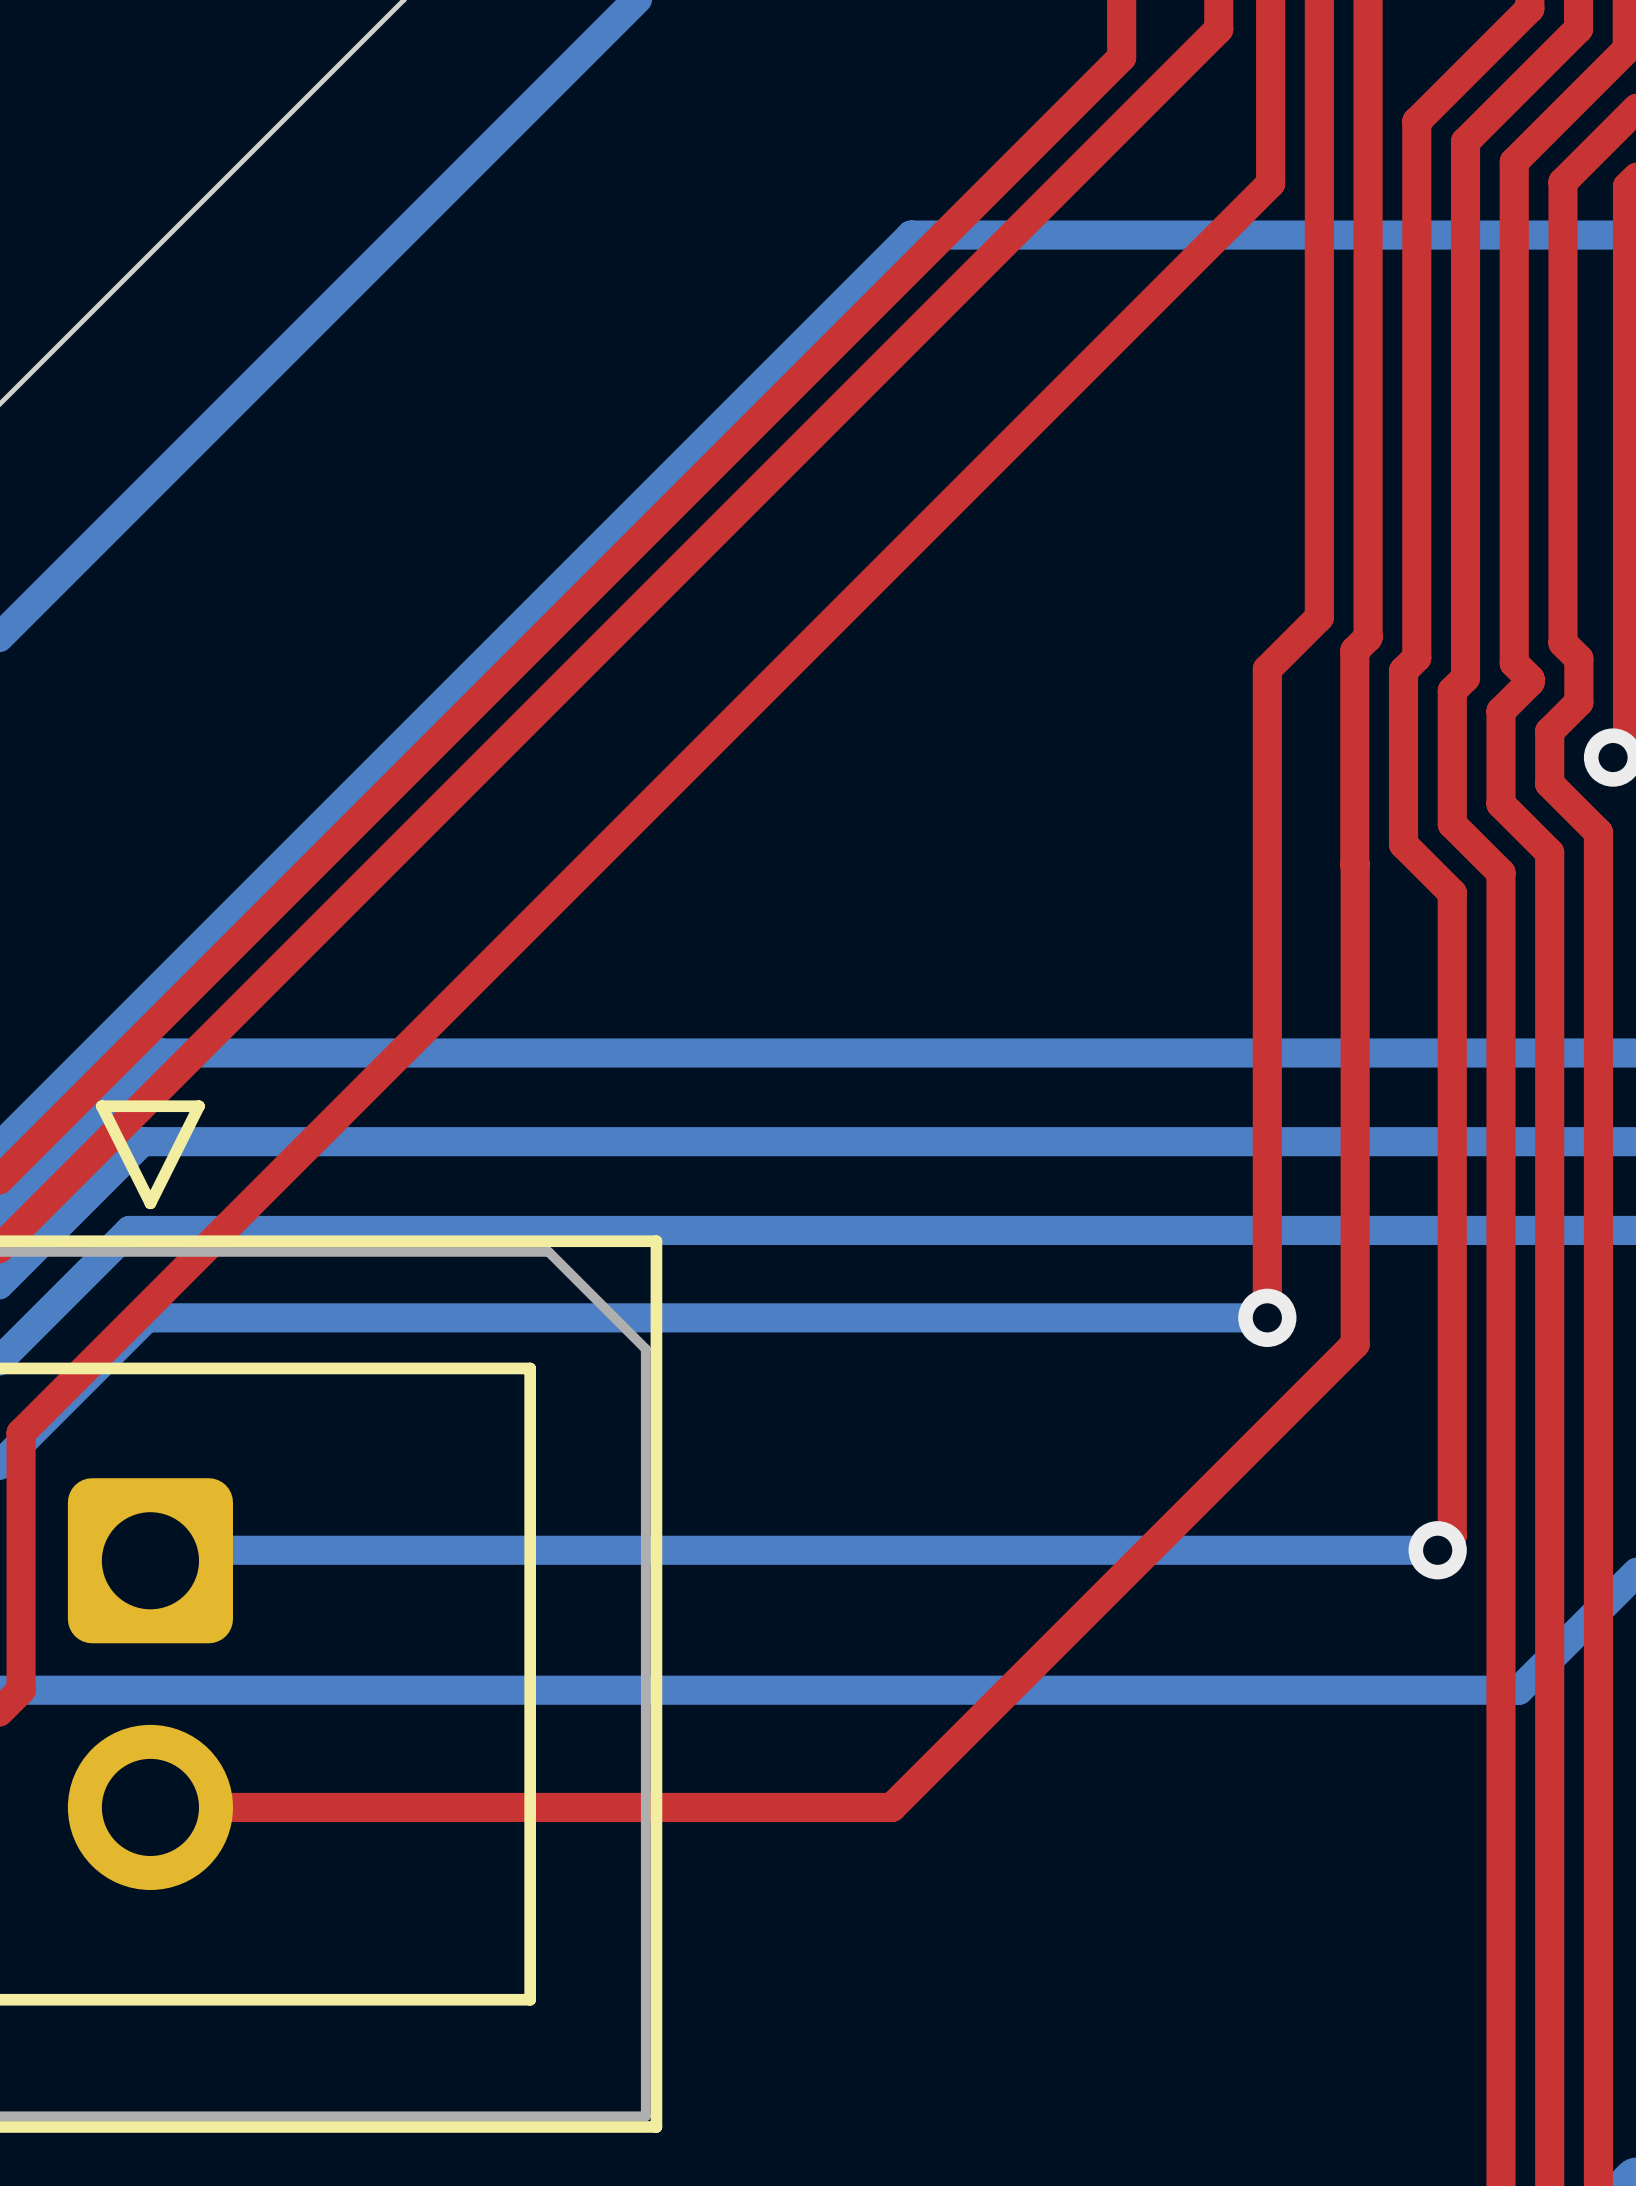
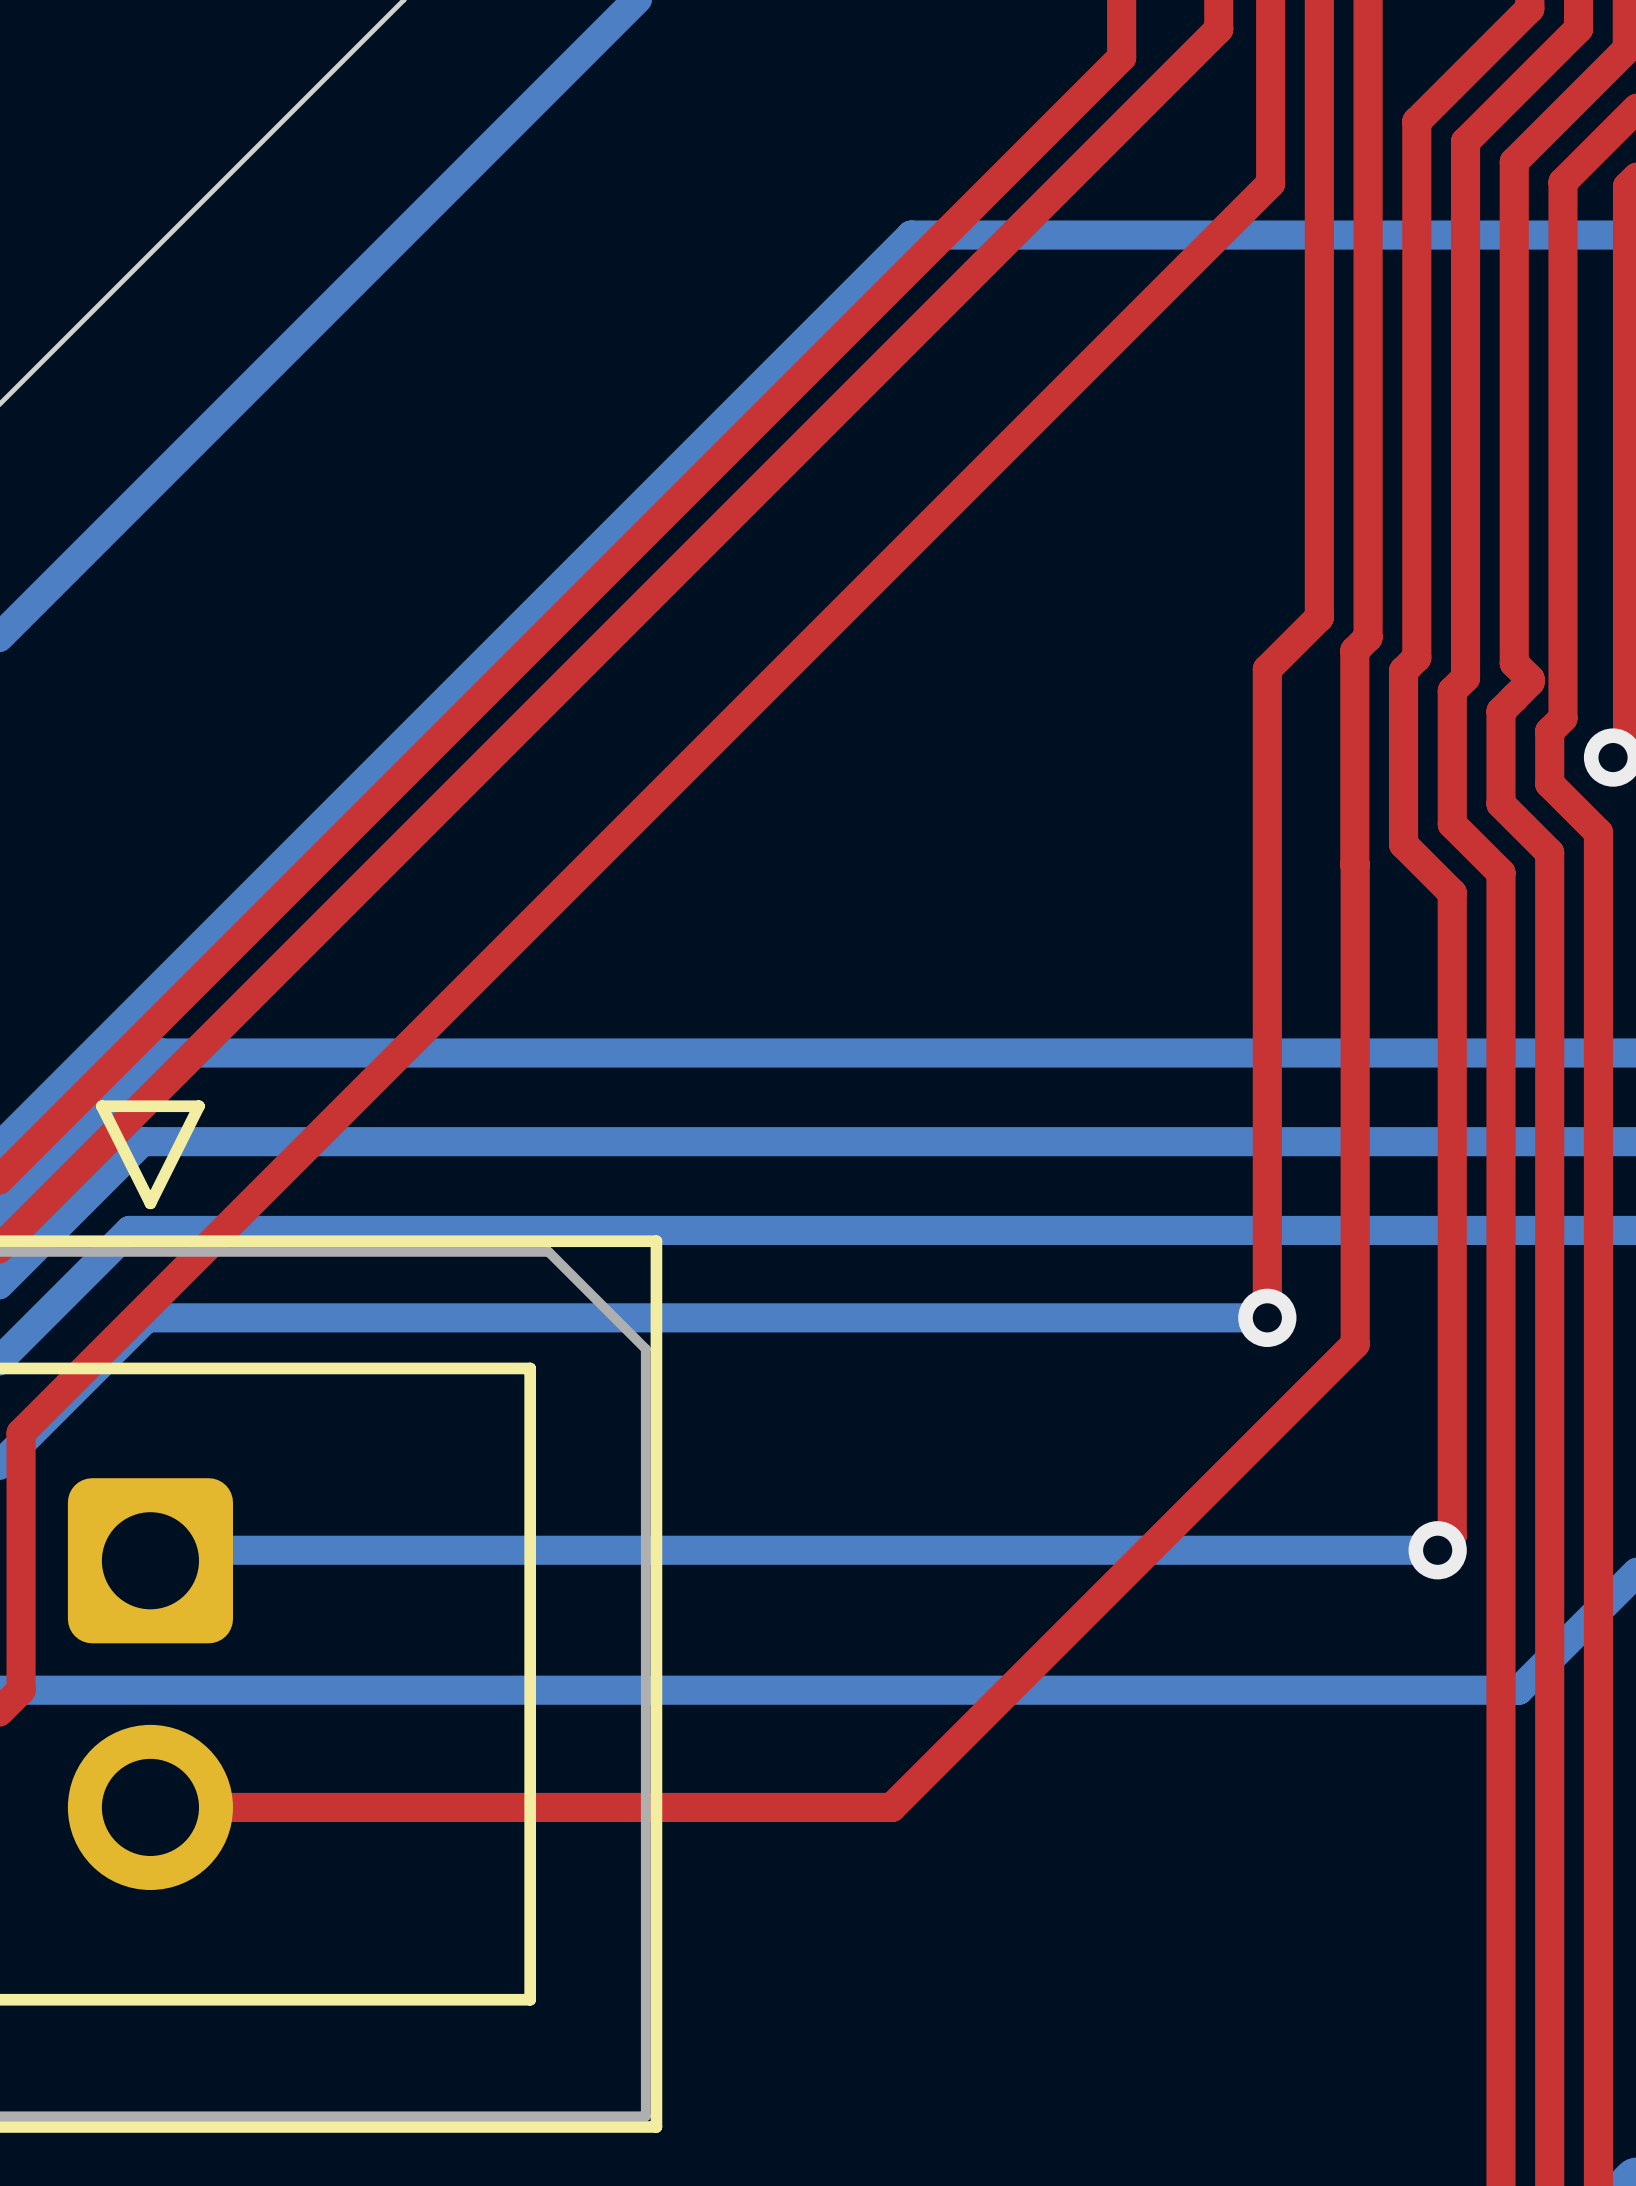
top track: (1562, 642) (1578, 658) (1578, 702) (1562, 718) -> (1562, 642) (1562, 718)

